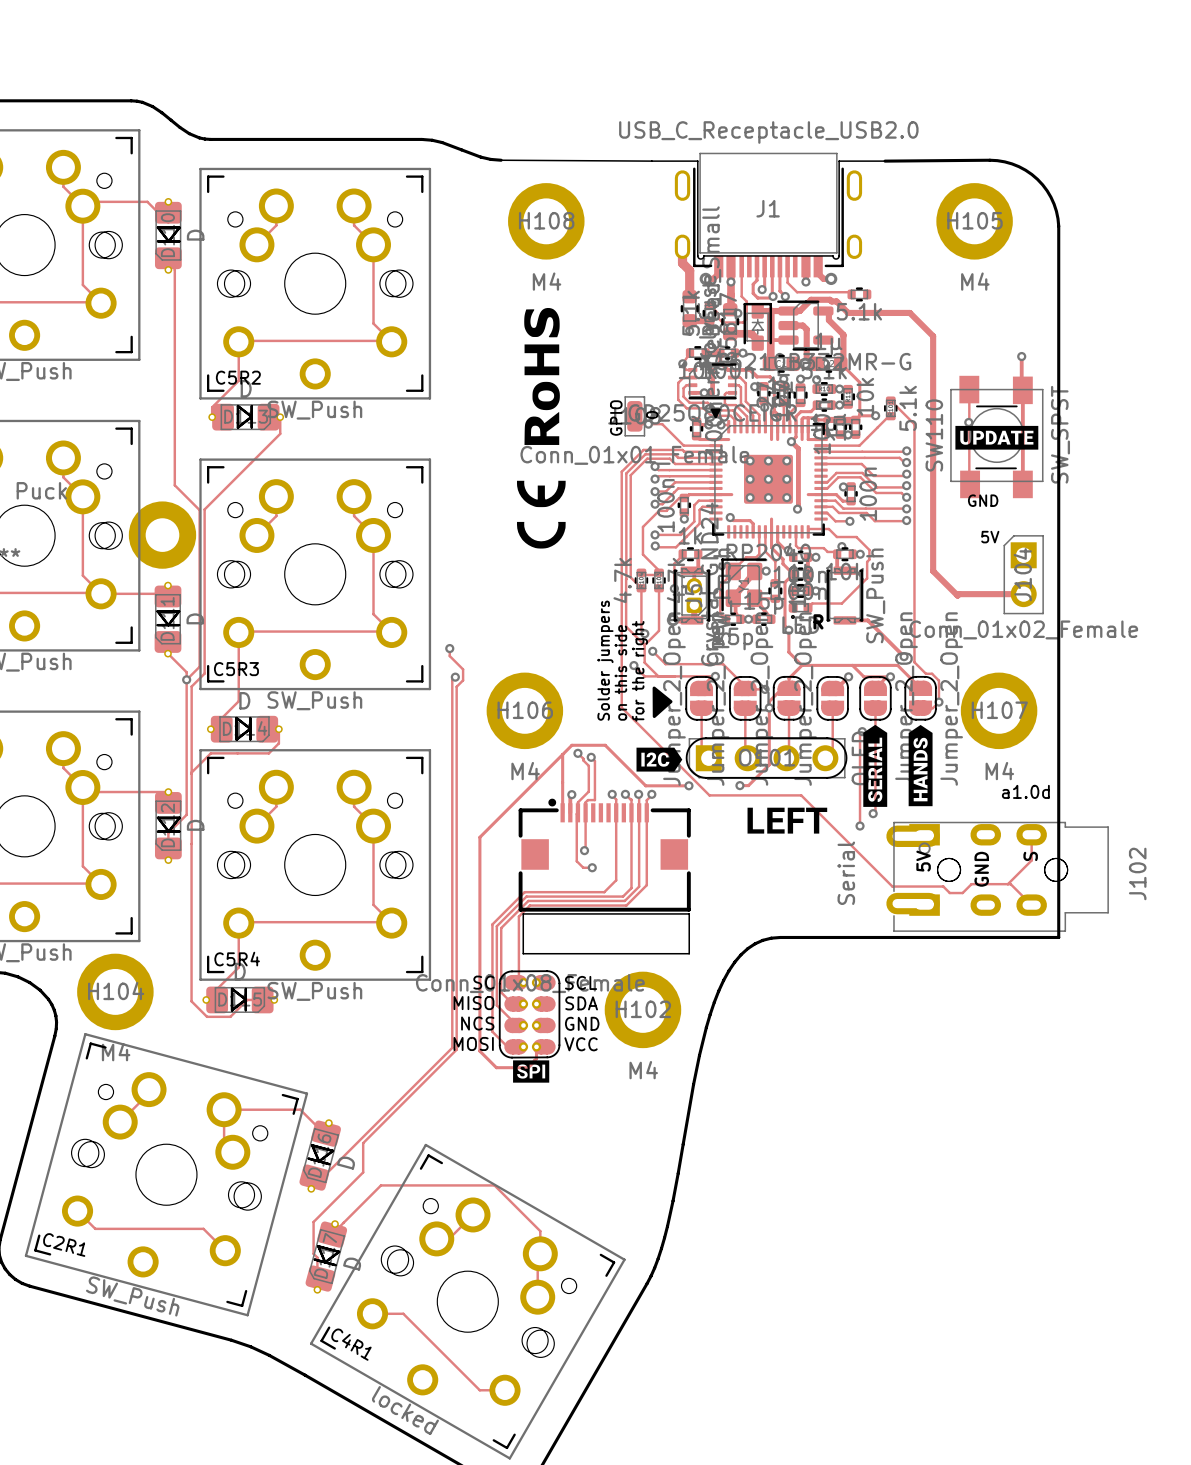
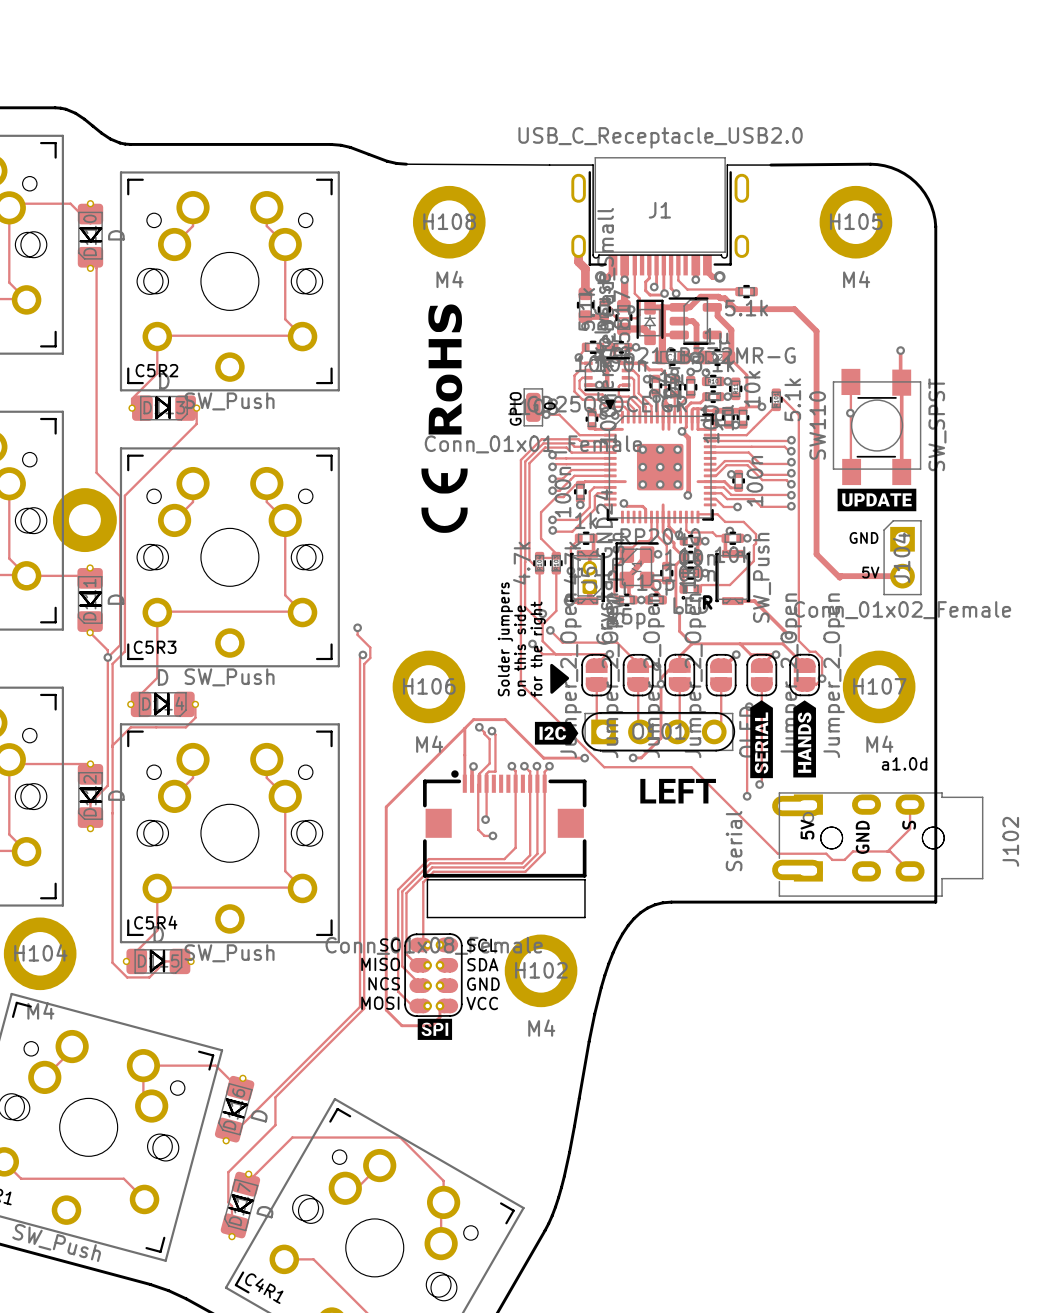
drawing position: (996, 437) -> (876, 499)
text position: GND (983, 500) -> GND (863, 537)
text position: 5V (990, 537) -> 5V (870, 572)

